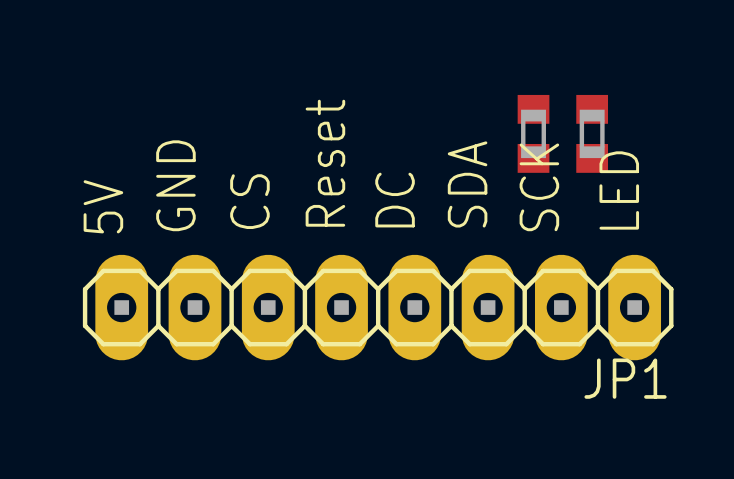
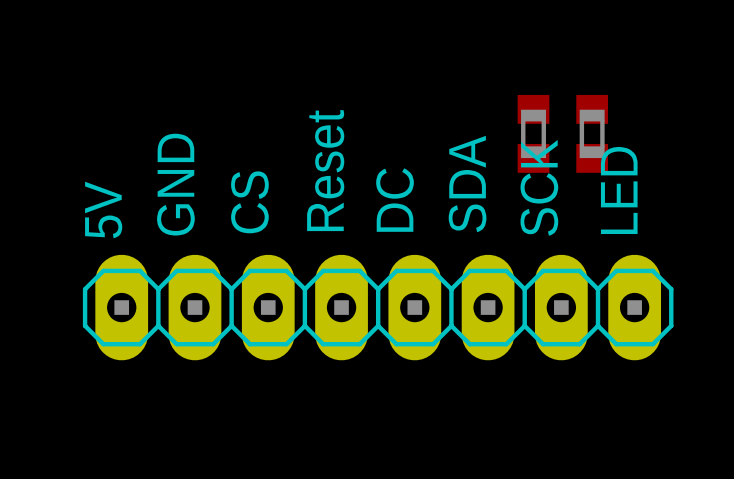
JP1 name: JP1 (625, 378) -> none

